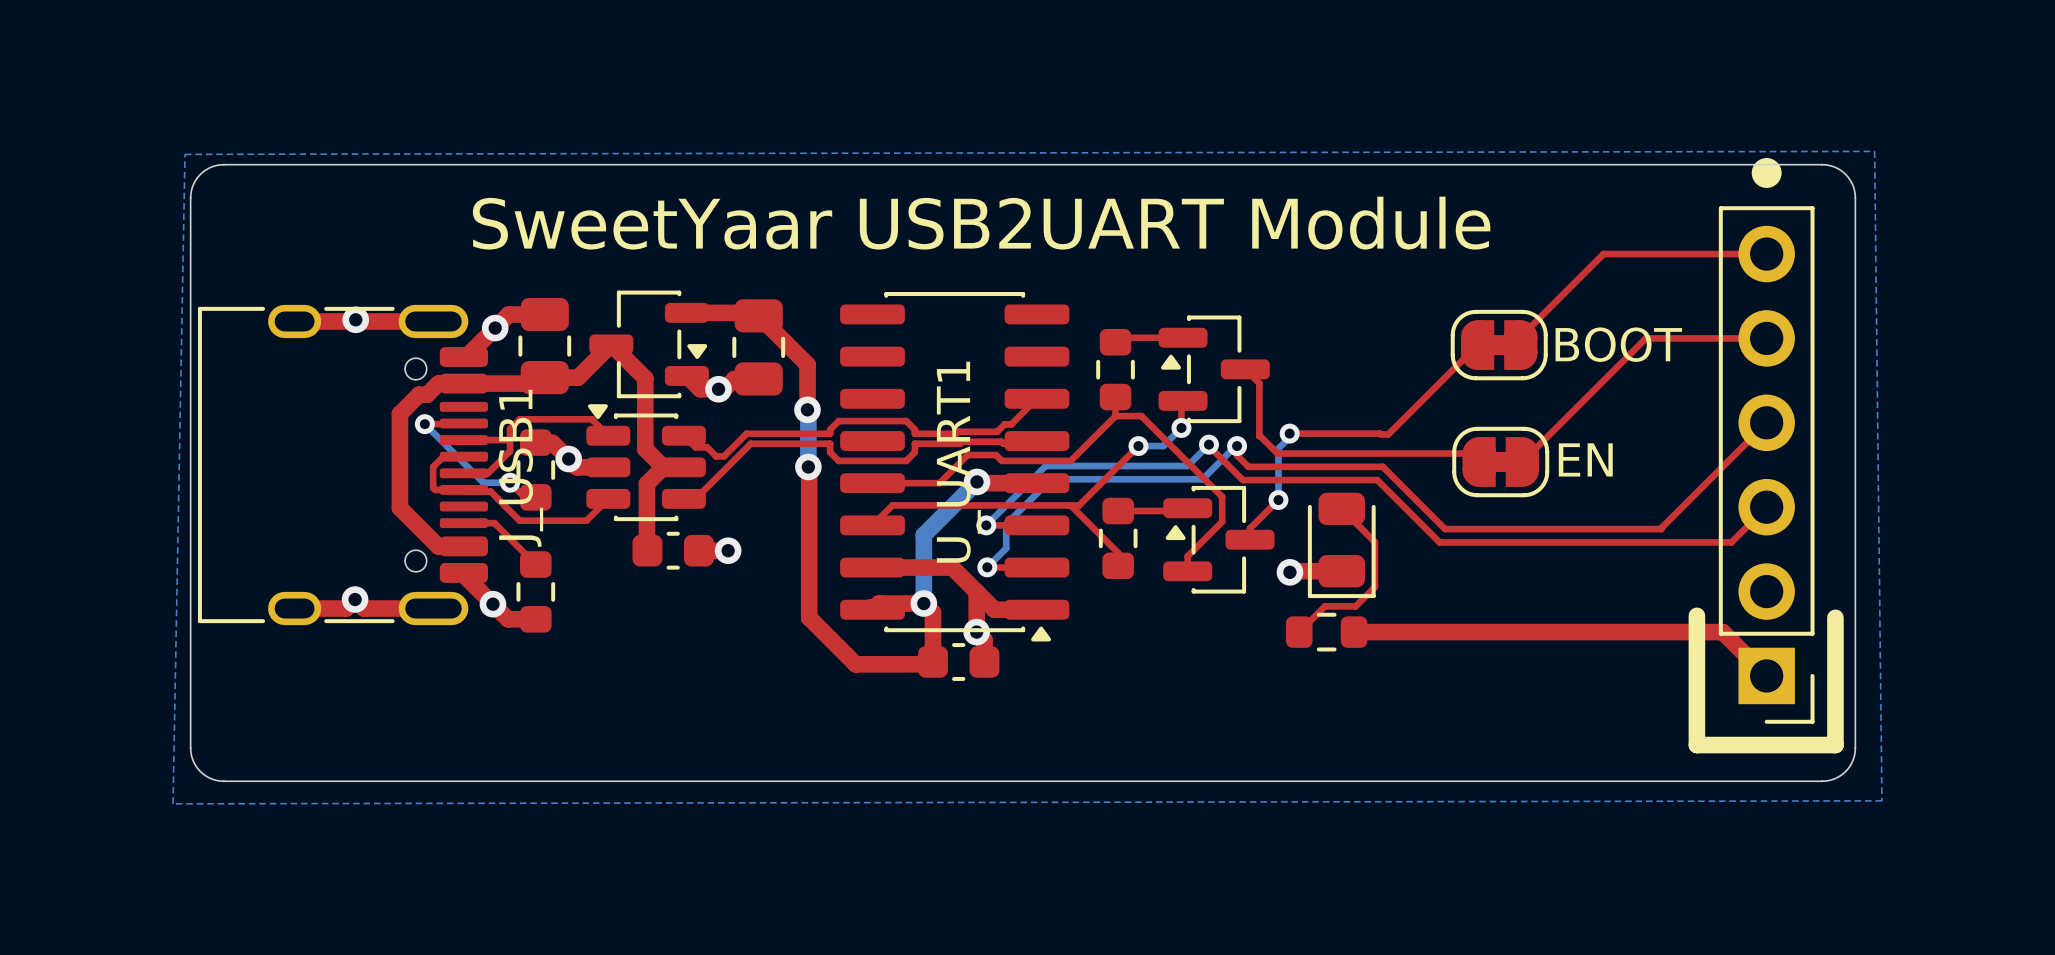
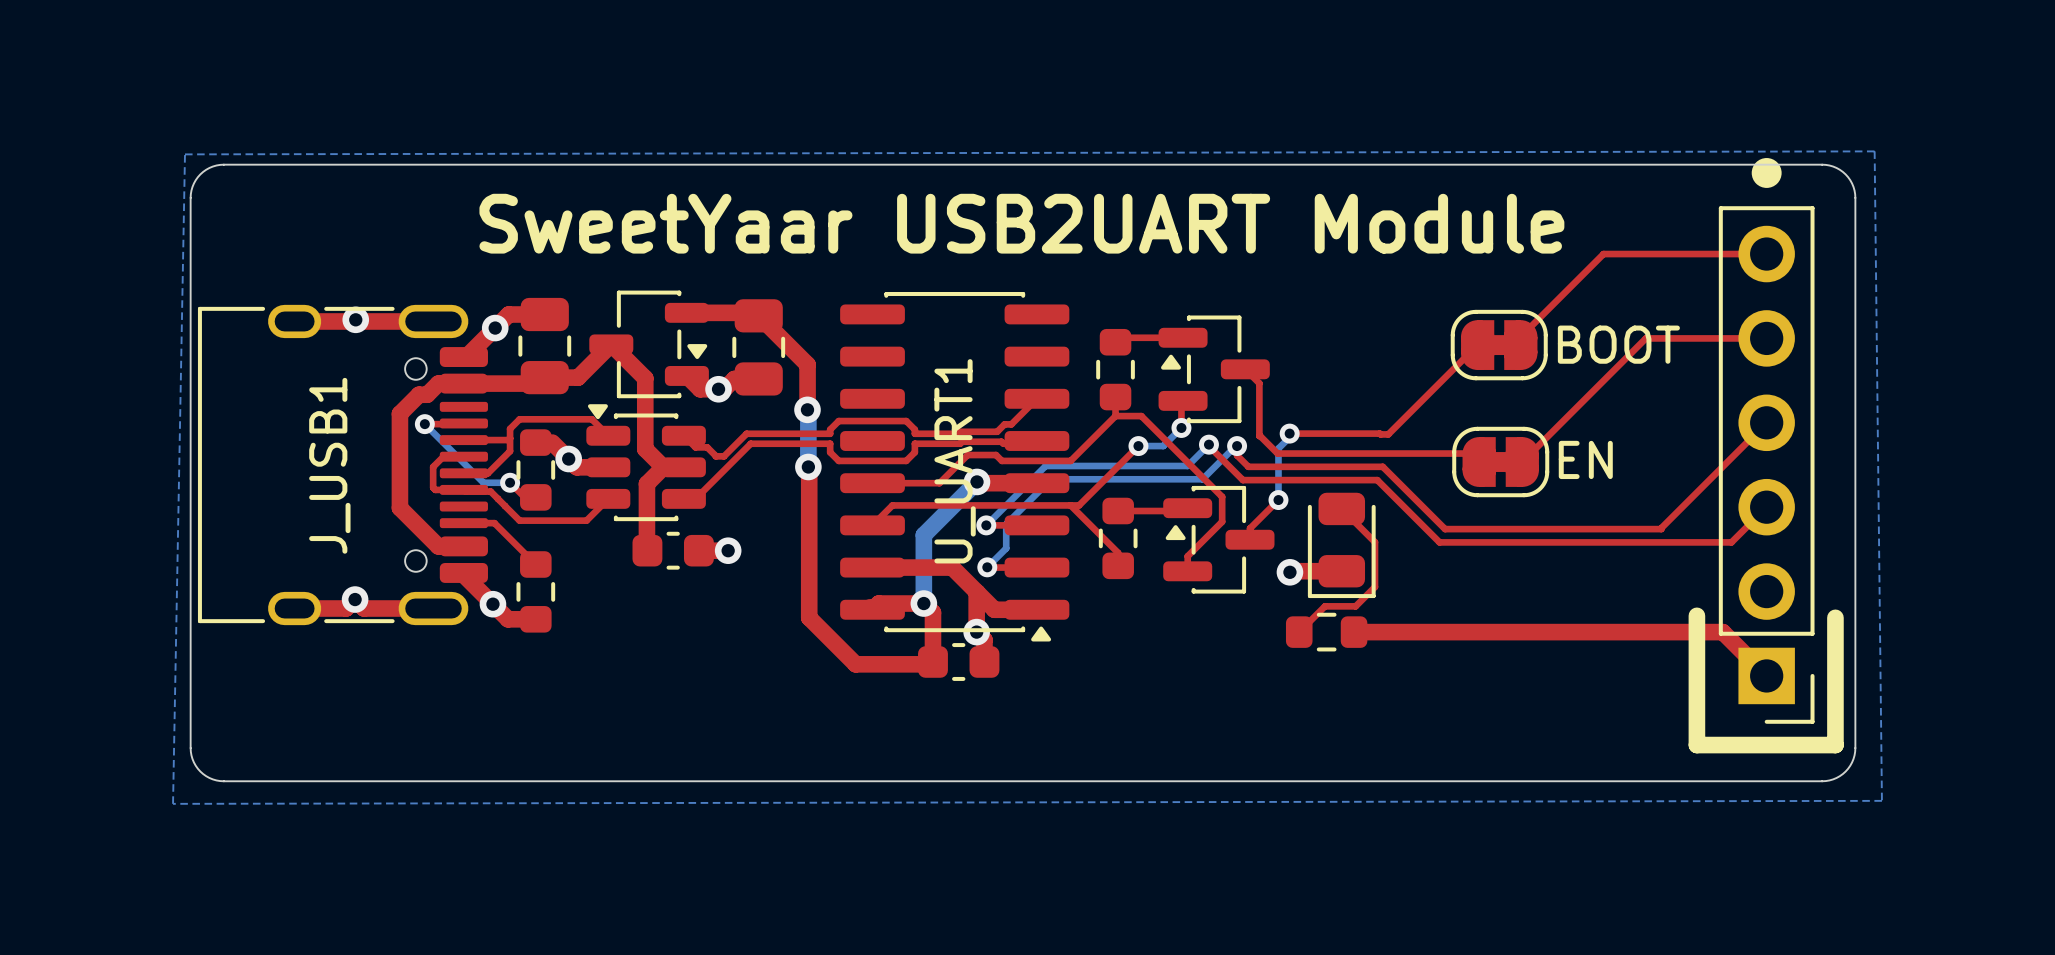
J_USB1 name position: J_USB1 (520, 468) -> J_USB1 (329, 465)

